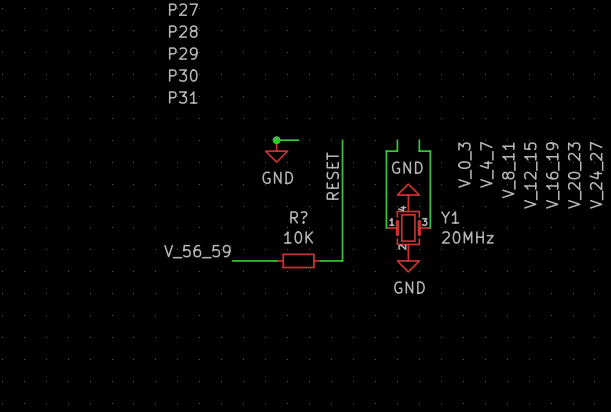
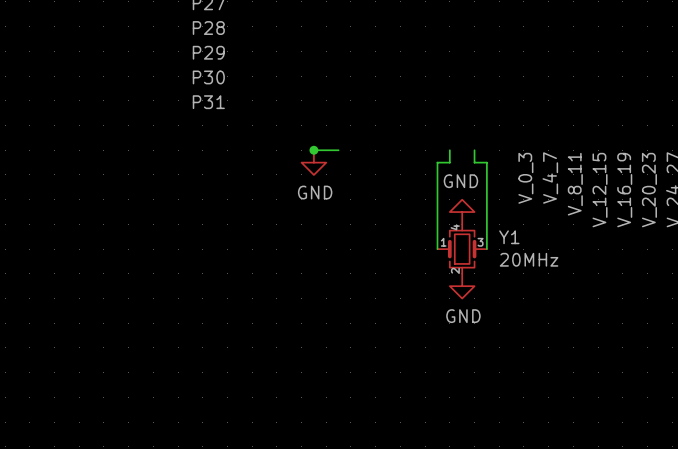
wire: (342, 140) (342, 260) (320, 260) -> none
label: RESET (332, 176) -> none
label: V_56_59 (197, 251) -> none
wire: (232, 260) (276, 260) -> none
R?: 10K (298, 260) -> none

